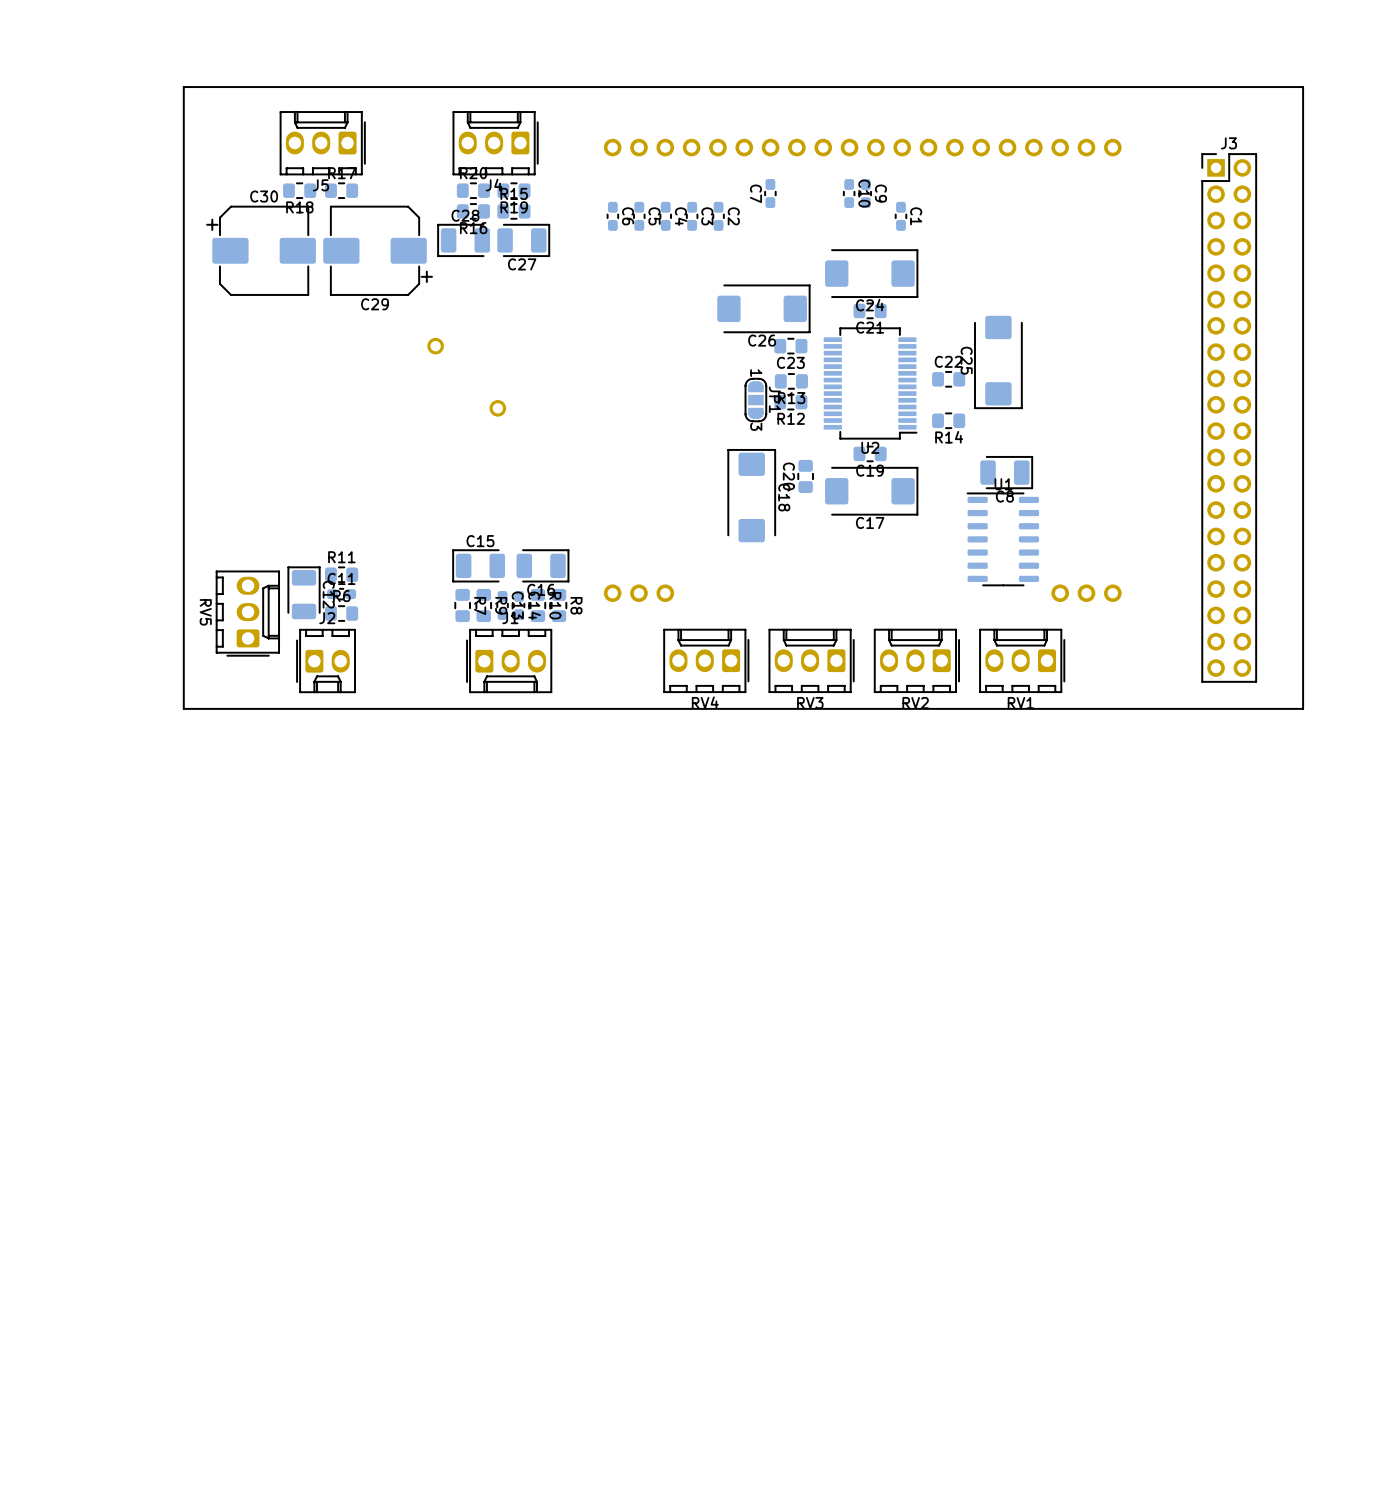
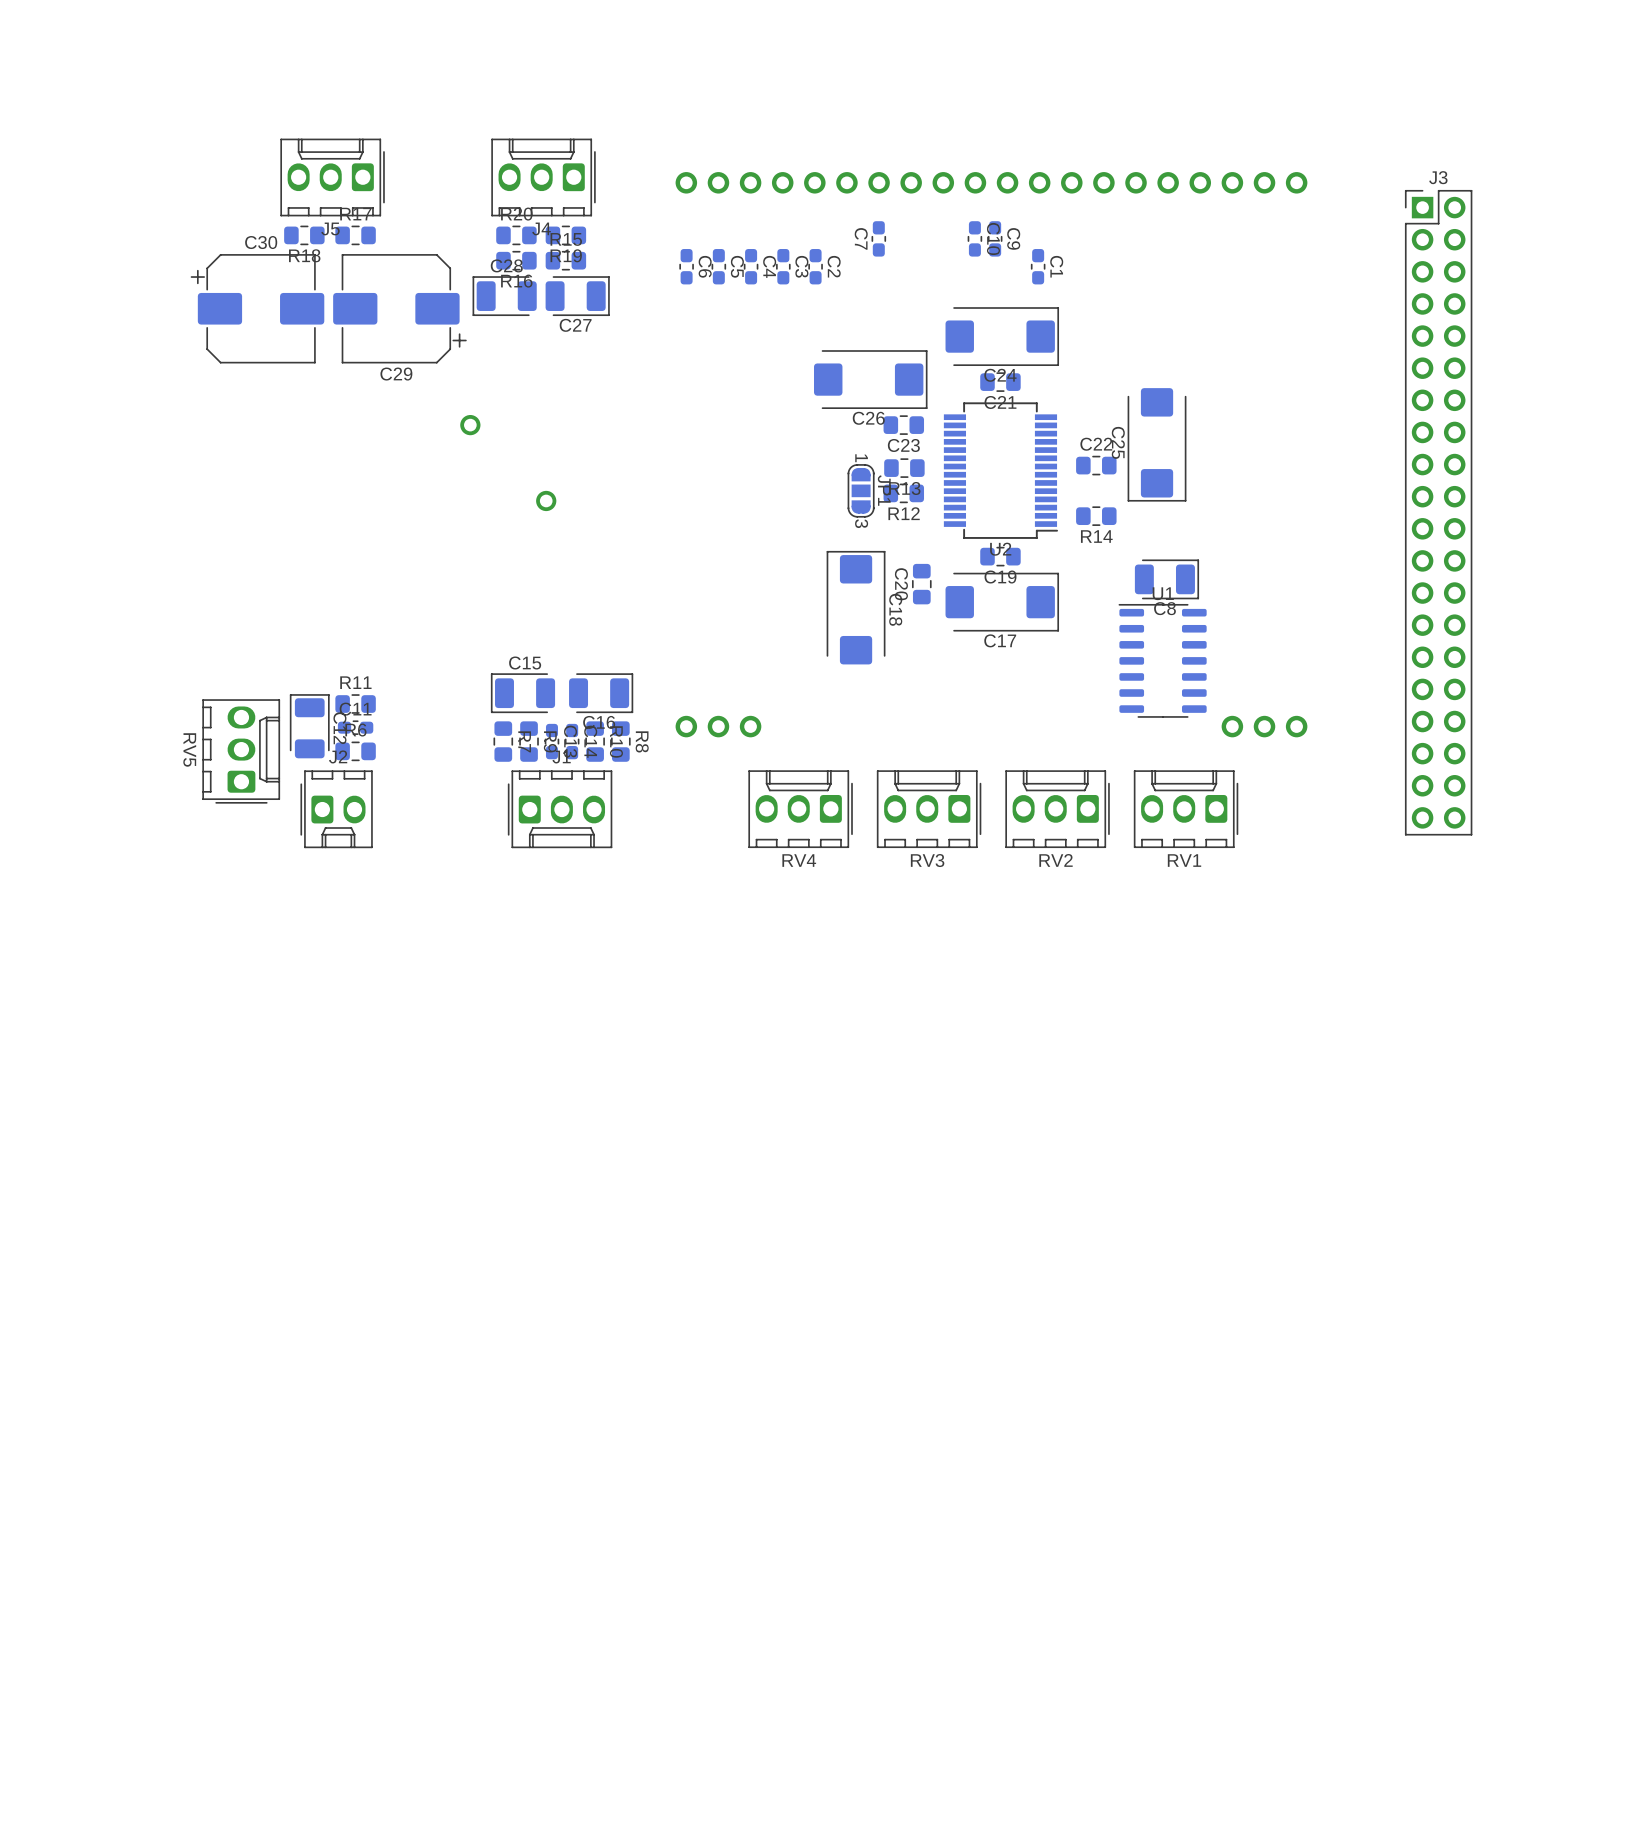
board edge: (1303, 87) (1303, 708) (183, 708) (183, 87) (1303, 87) -> none

